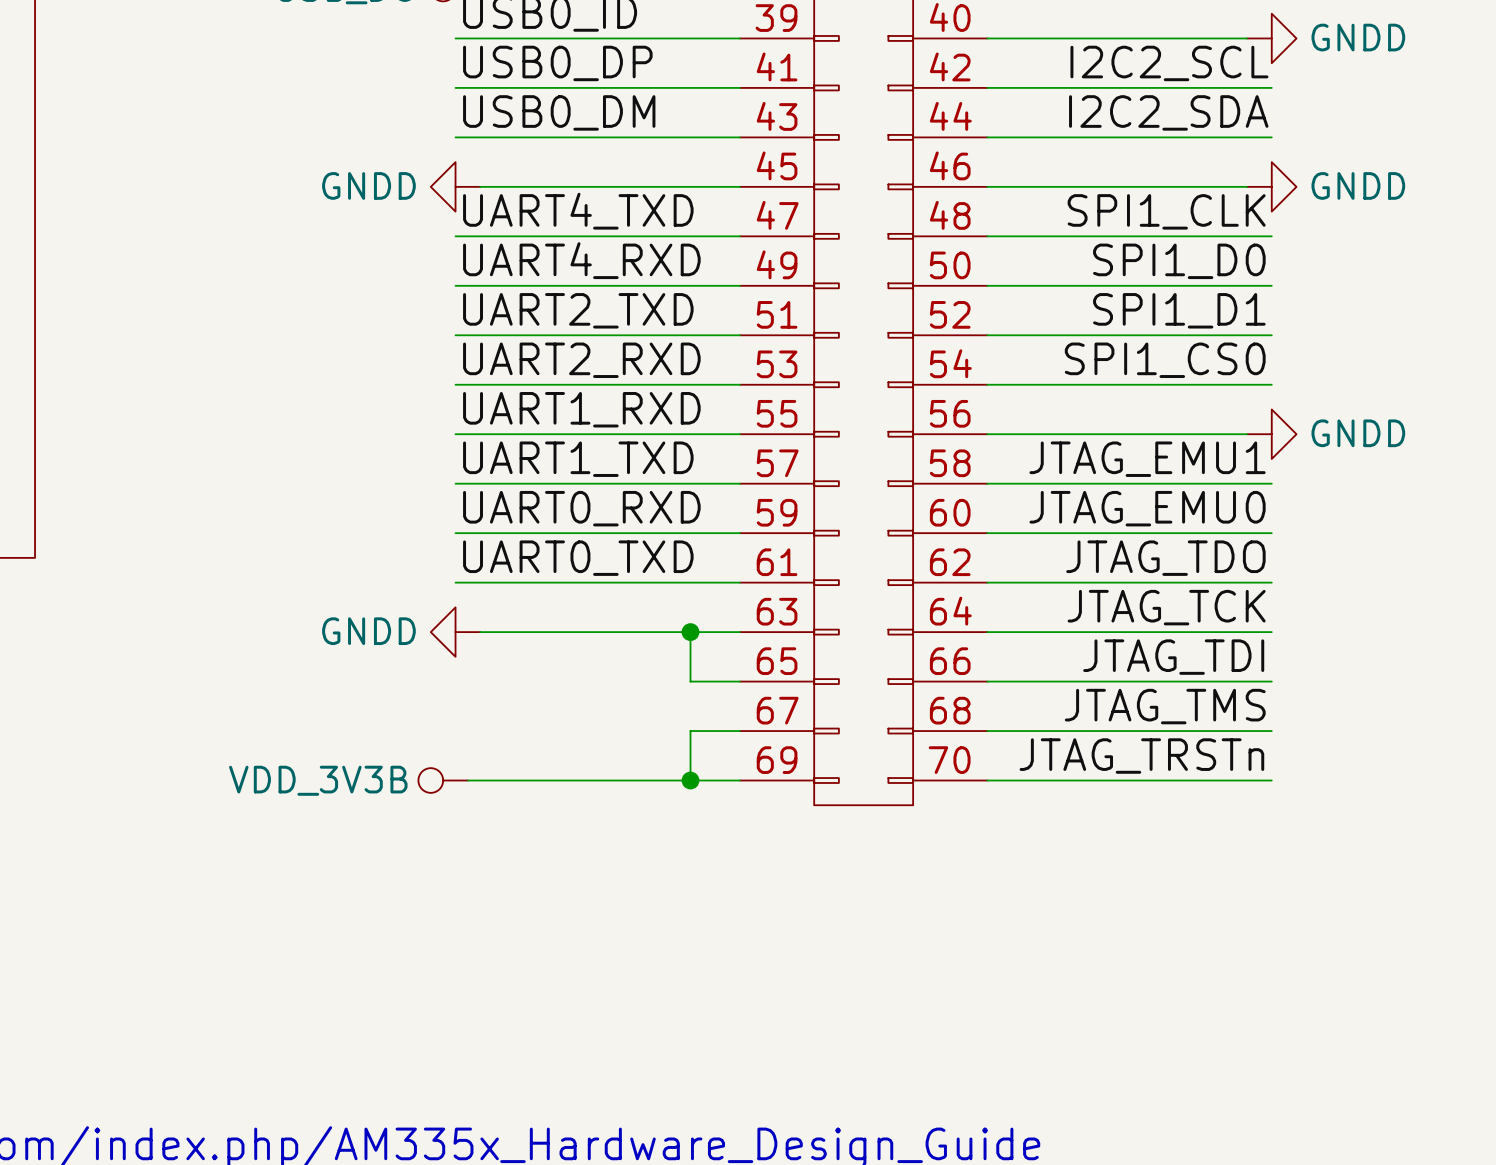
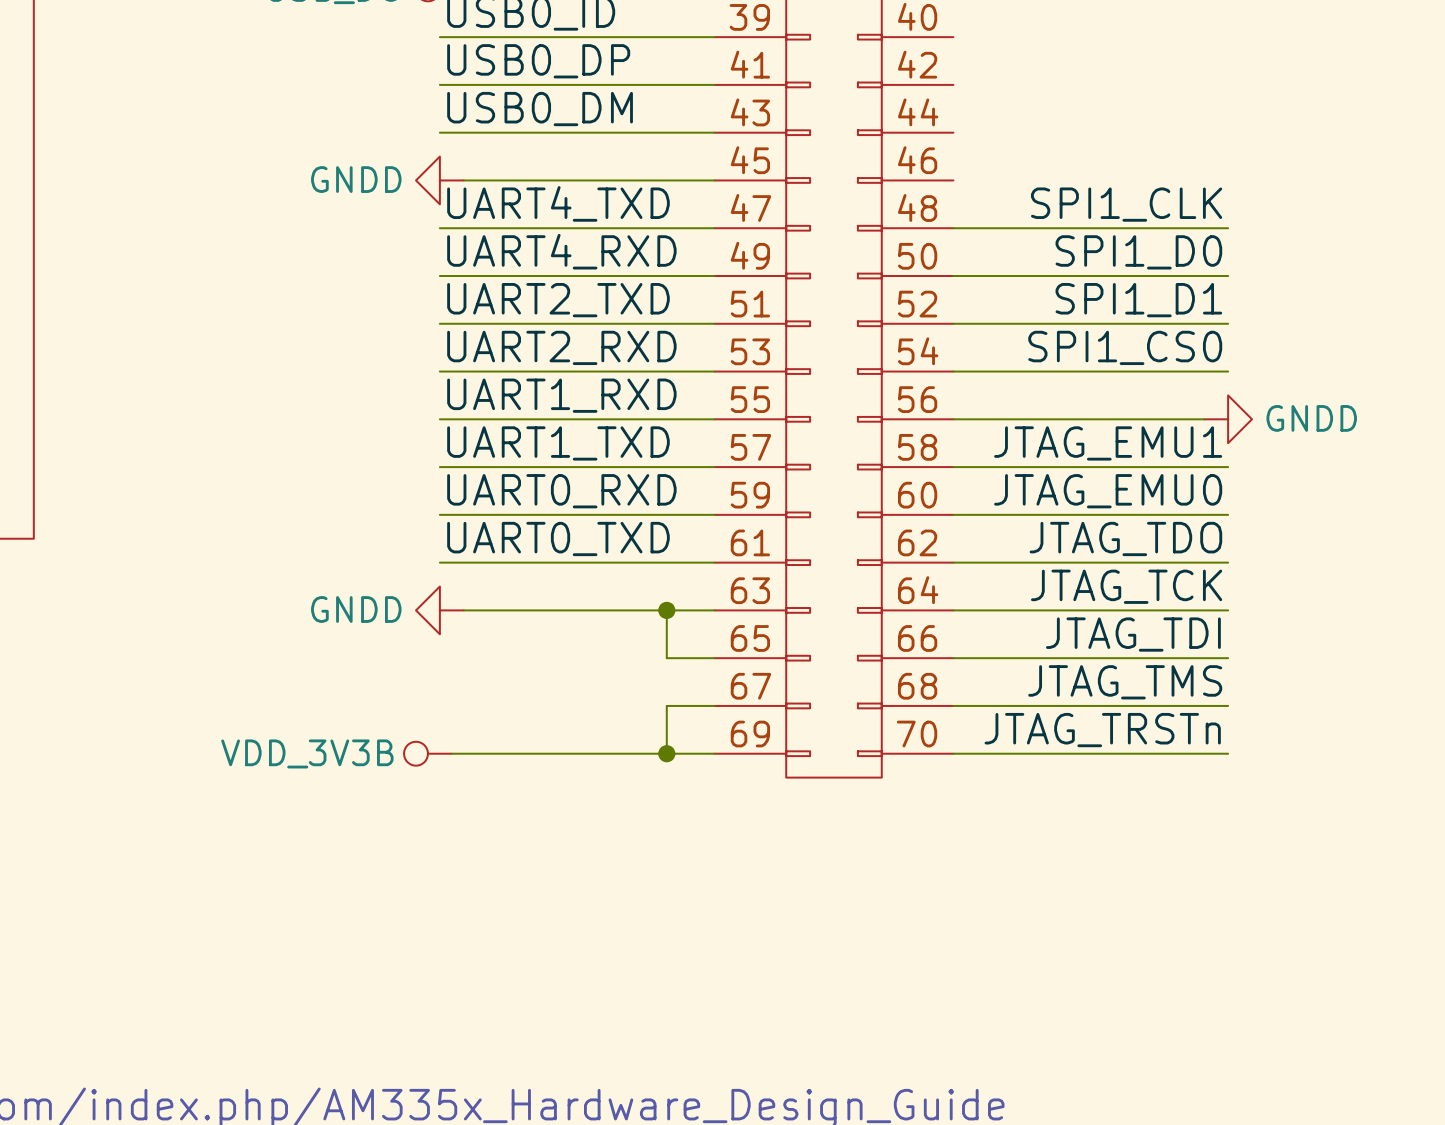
wire: (987, 38) (1247, 38) -> none
power symbol: GNDD (1271, 38) -> none
label: I2C2_SCL (1169, 63) -> none
wire: (987, 87) (1271, 87) -> none
label: I2C2_SDA (1168, 112) -> none
wire: (987, 137) (1271, 137) -> none
wire: (987, 186) (1247, 186) -> none
power symbol: GNDD (1271, 186) -> none

